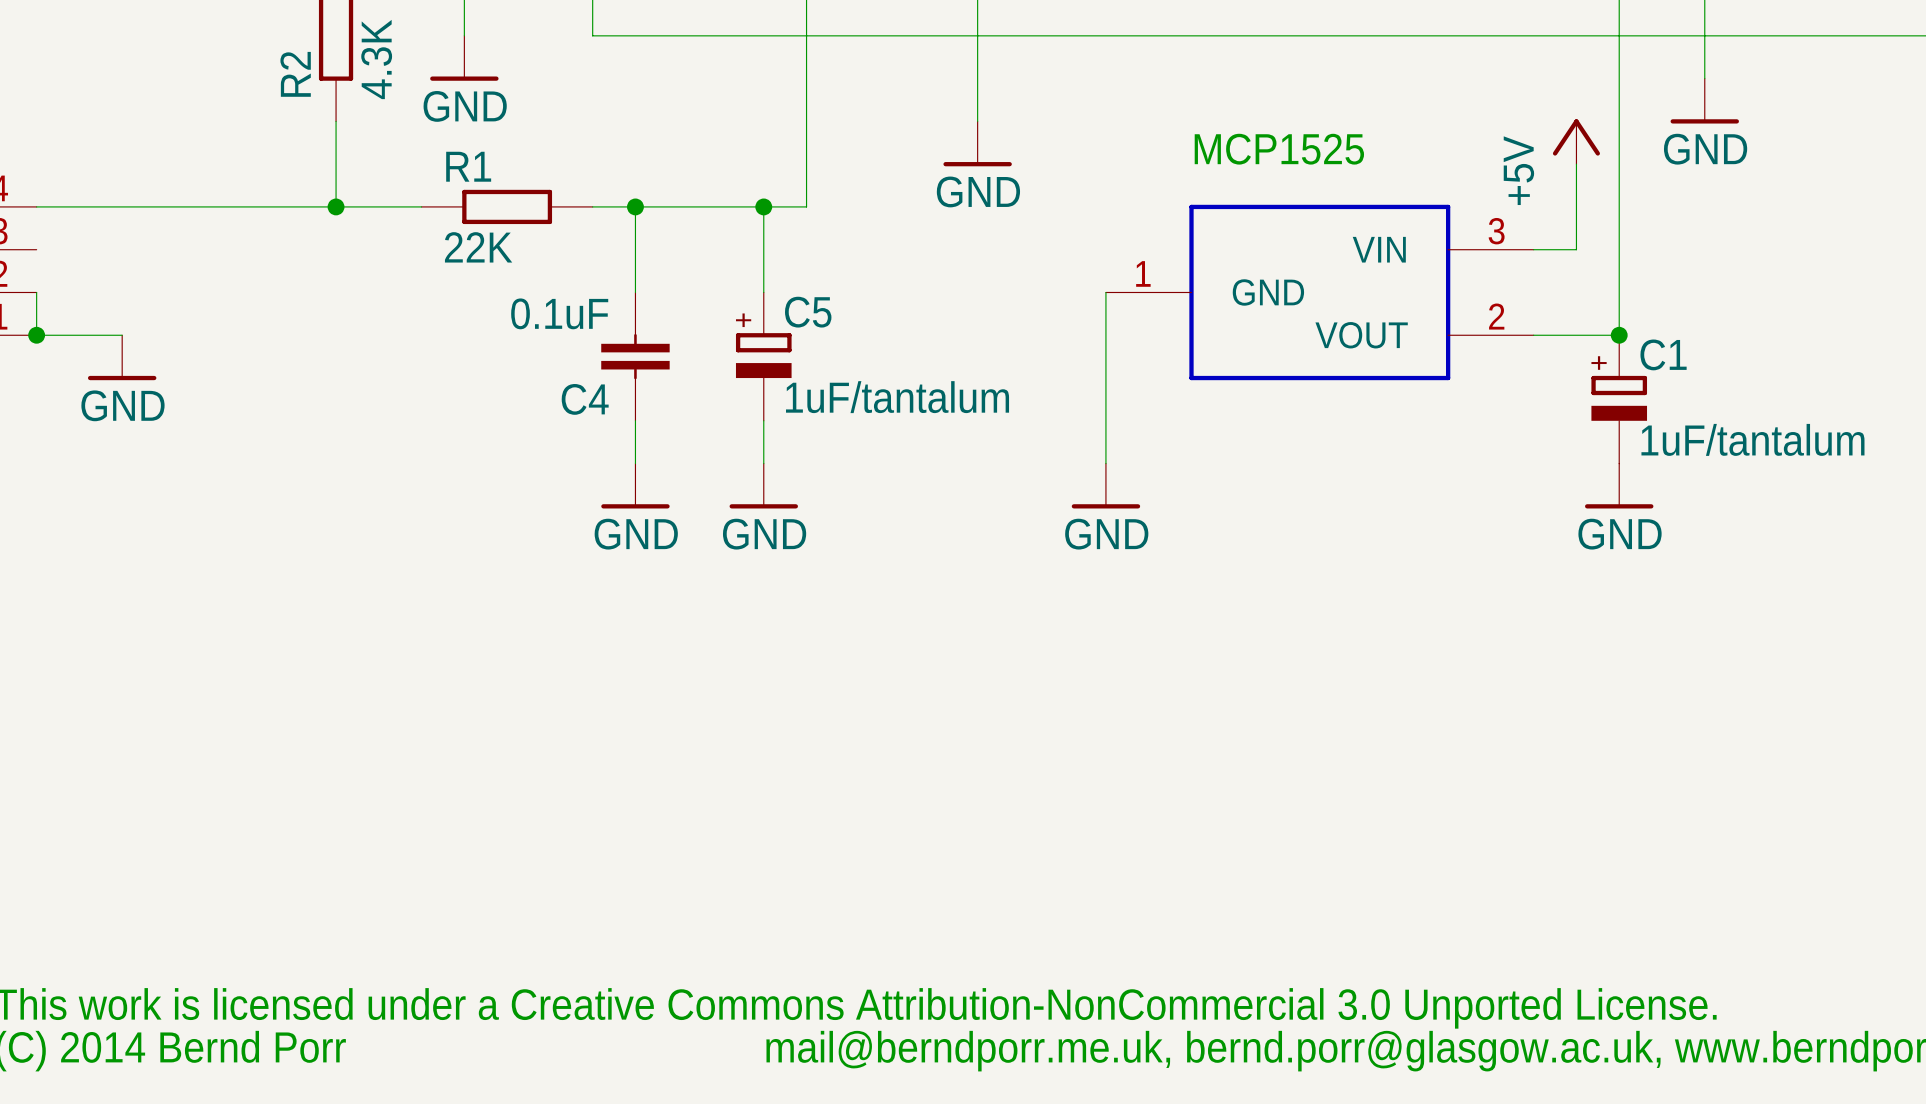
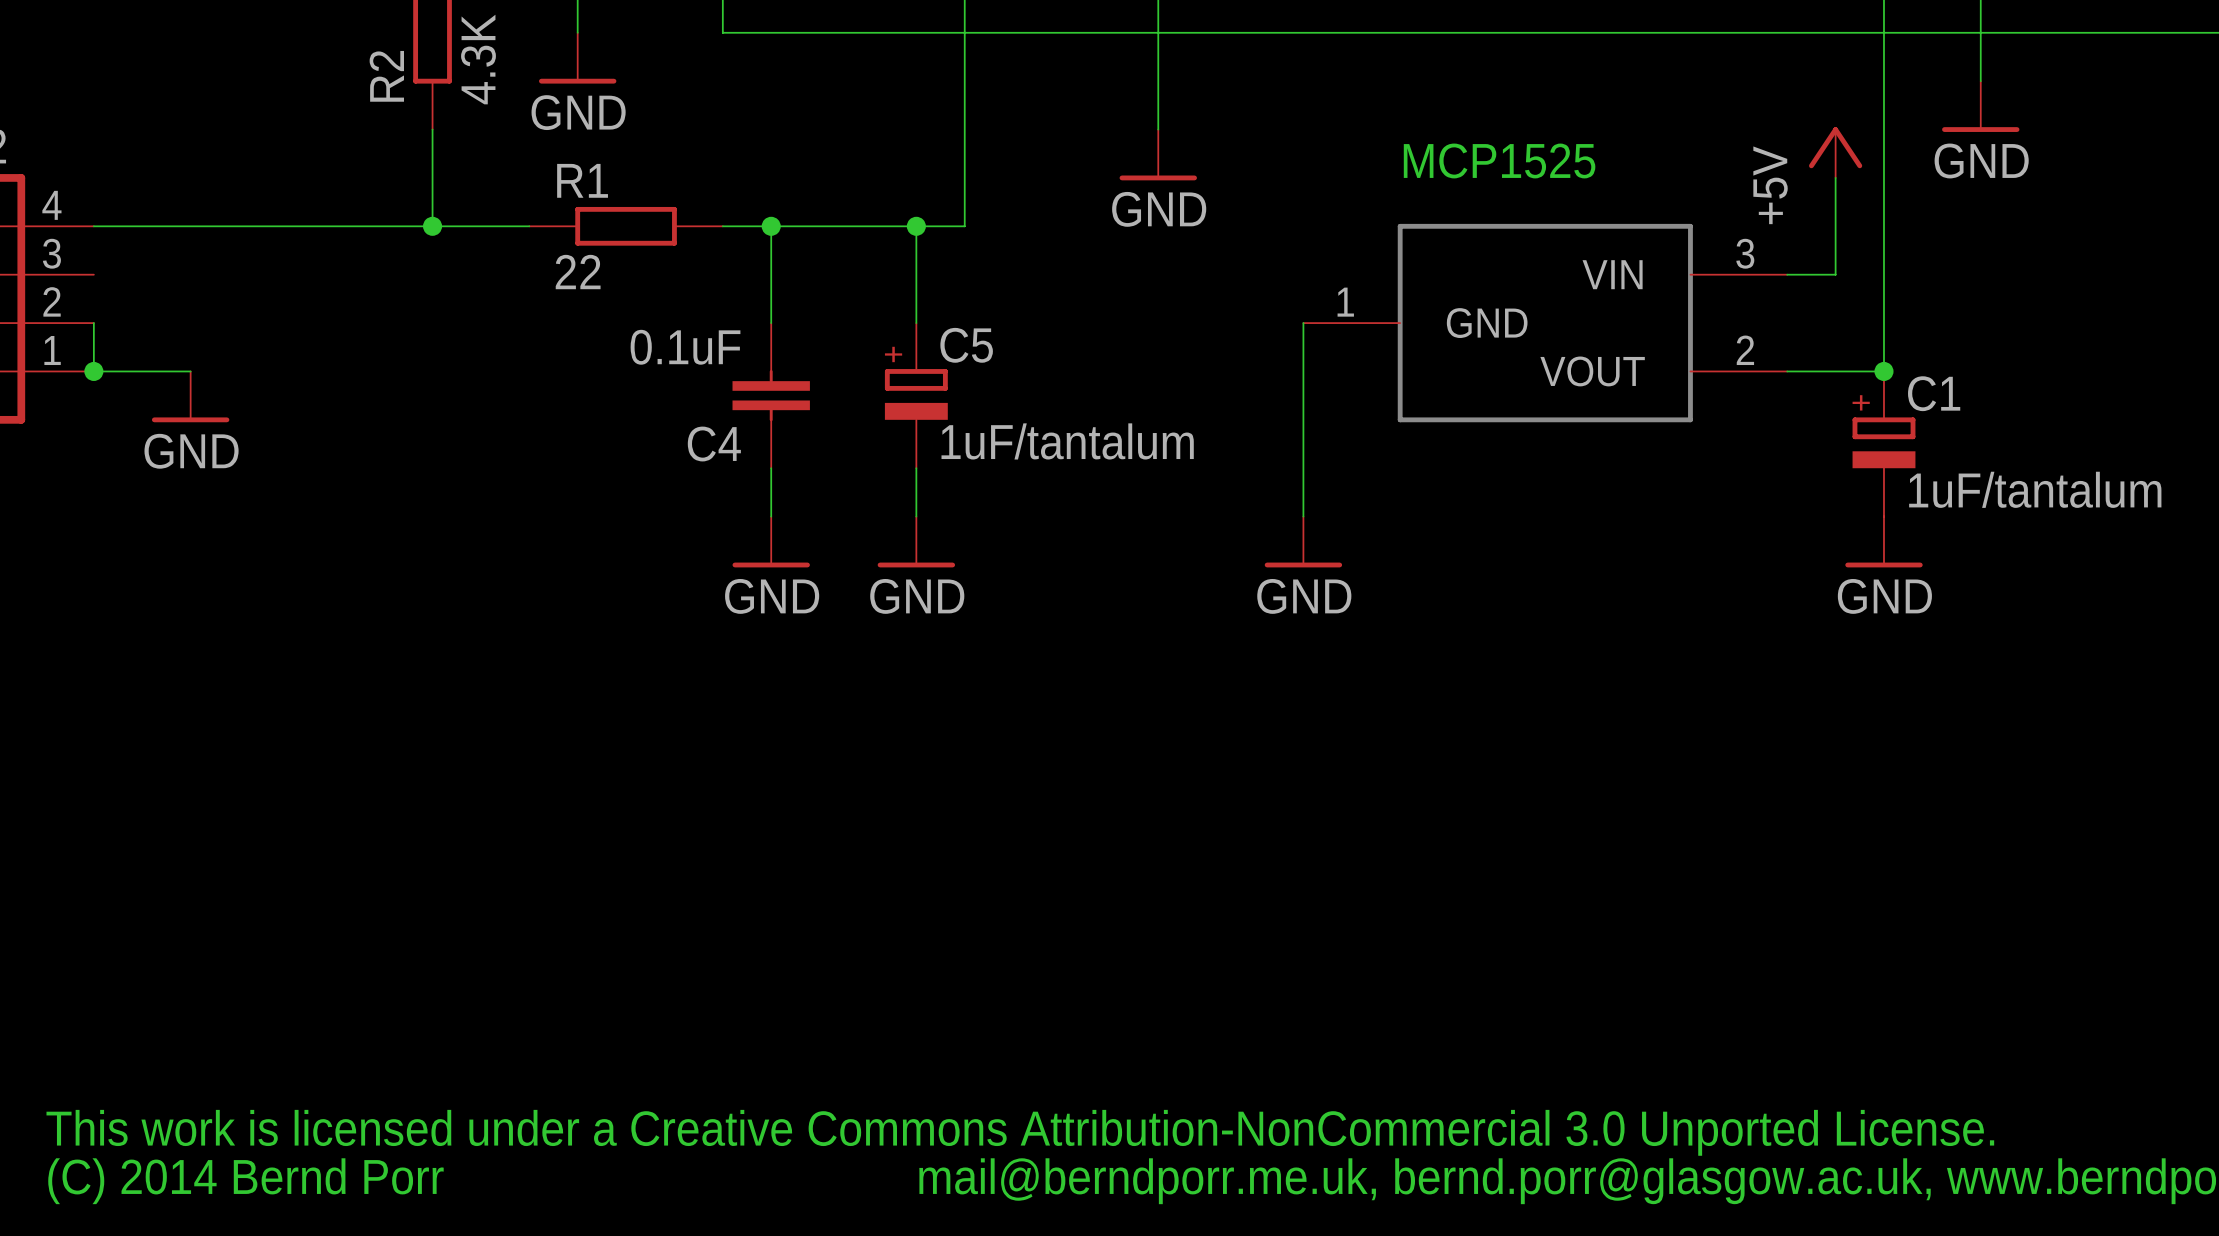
R1 value: 22K (478, 247) -> 22 (578, 272)

